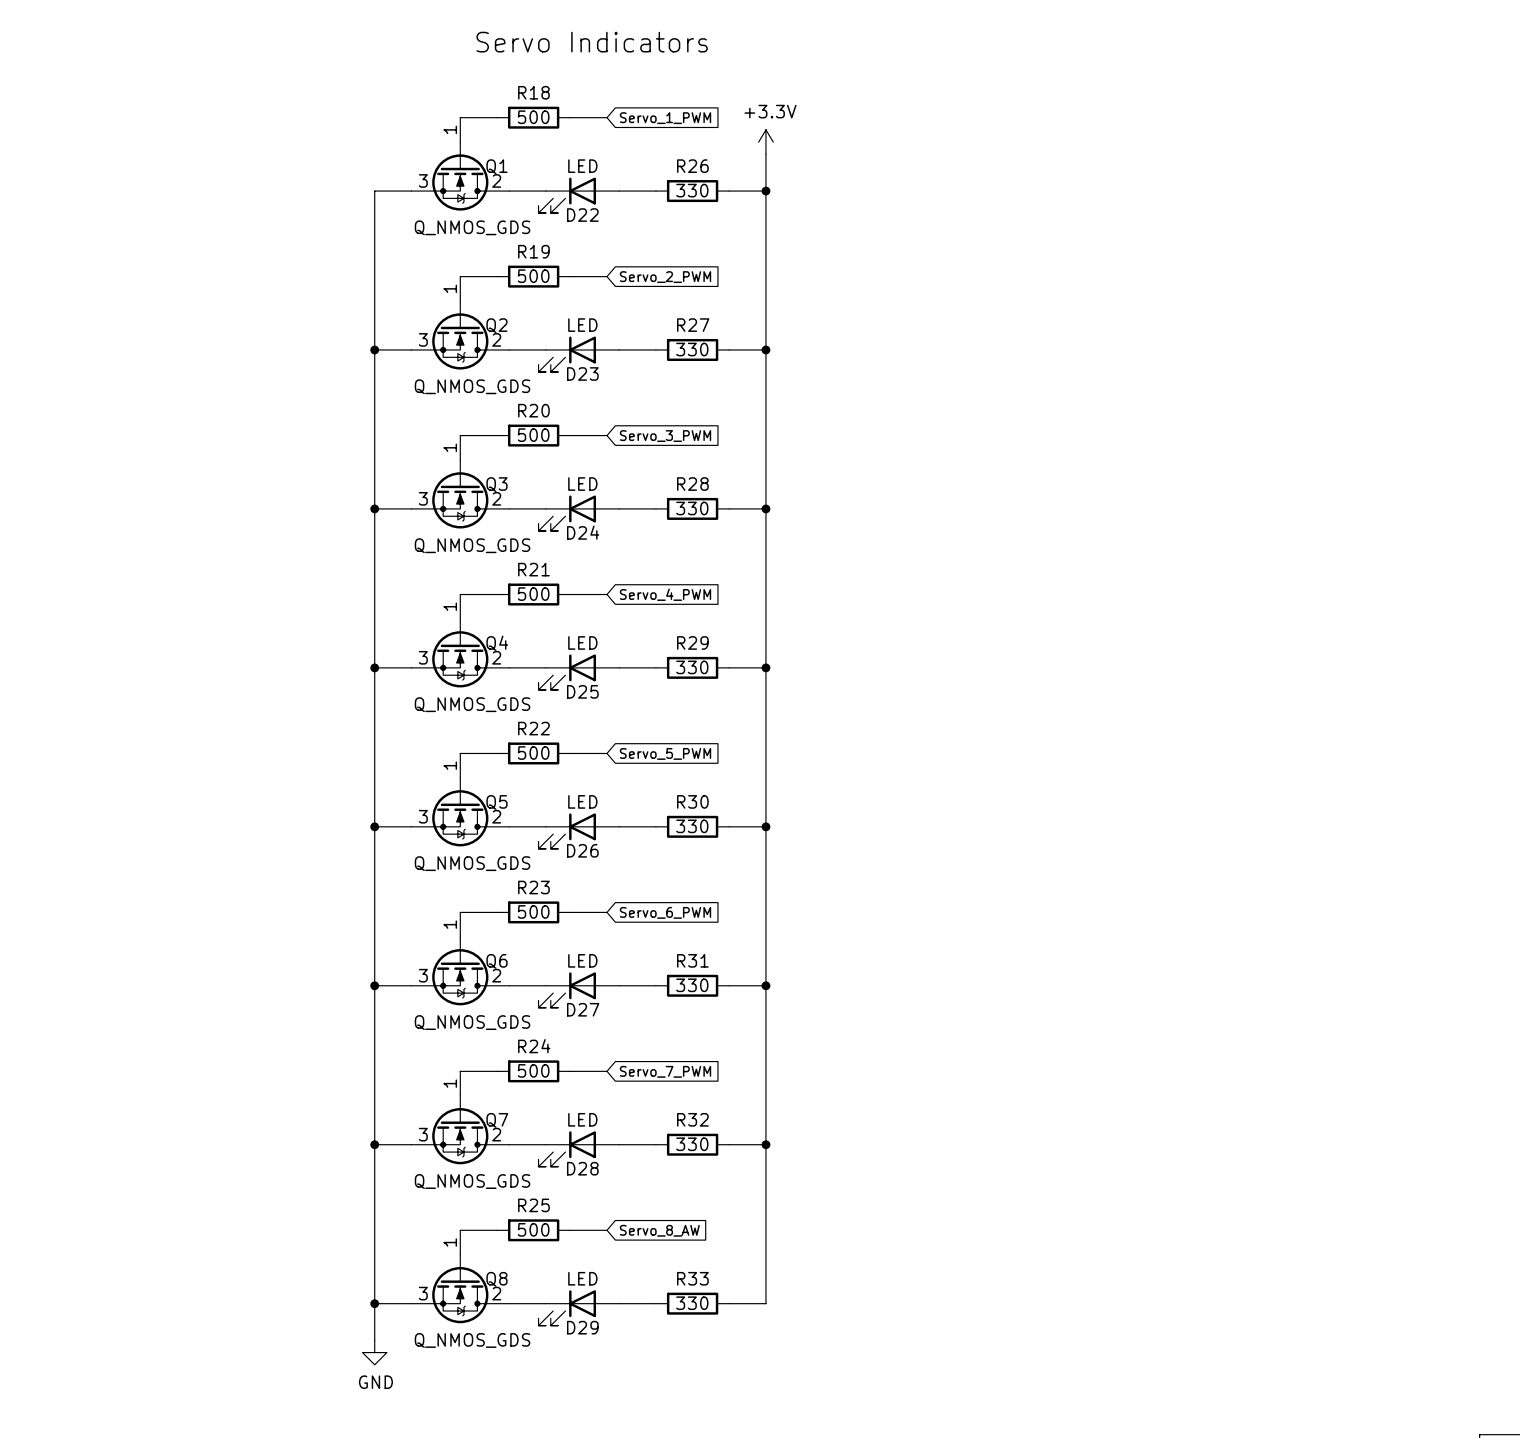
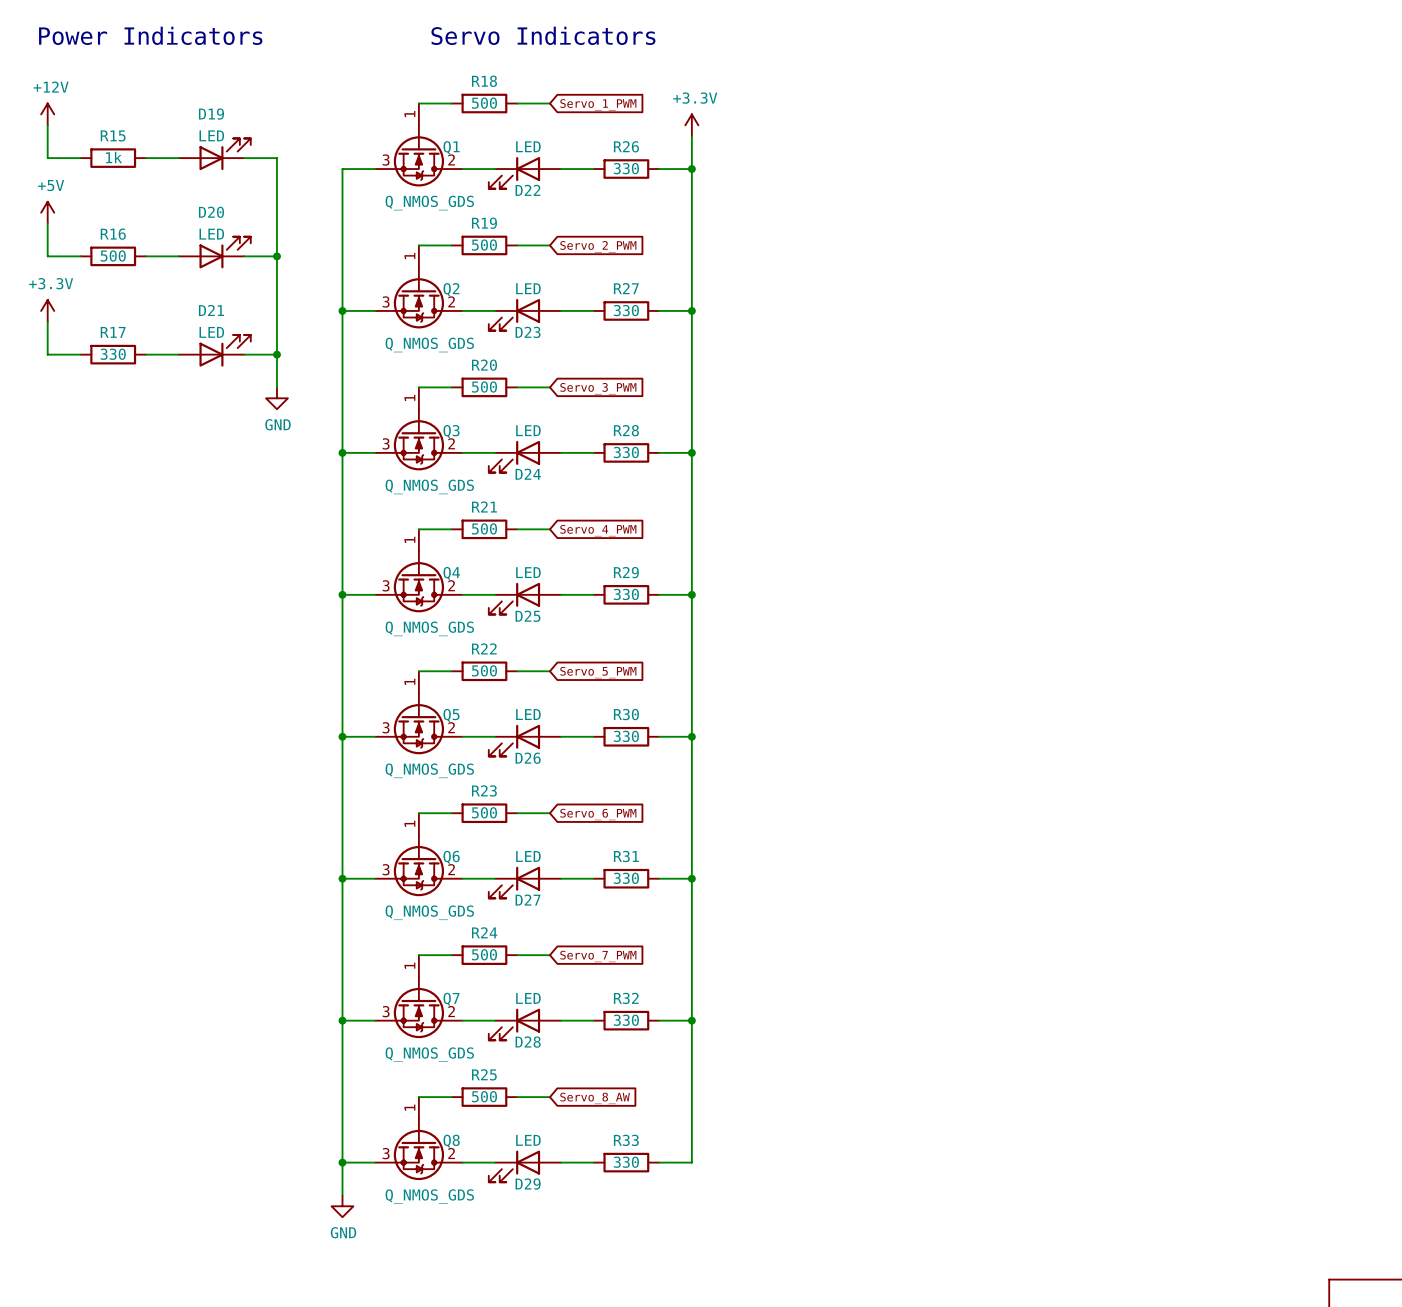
text: none -> Power Indicators (150, 35)
power symbol: none -> +12V (47, 114)
wire: none -> (47, 125) (47, 158) (80, 158)
D19: none -> LED (214, 154)
R15: none -> 1k (113, 158)
wire: none -> (145, 158) (178, 158)
wire: none -> (244, 158) (276, 158) (276, 387)
power symbol: none -> +5V (47, 212)
wire: none -> (47, 223) (47, 256) (80, 256)
D20: none -> LED (214, 252)
R16: none -> 500 (113, 256)
wire: none -> (145, 256) (178, 256)
wire: none -> (244, 256) (276, 256)
junction: none -> (276, 256)
power symbol: none -> +3.3V (47, 310)
wire: none -> (47, 321) (47, 354) (80, 354)
D21: none -> LED (214, 350)
R17: none -> 330 (113, 354)
wire: none -> (145, 354) (178, 354)
wire: none -> (244, 354) (276, 354)
junction: none -> (276, 354)
power symbol: none -> GND (276, 398)

